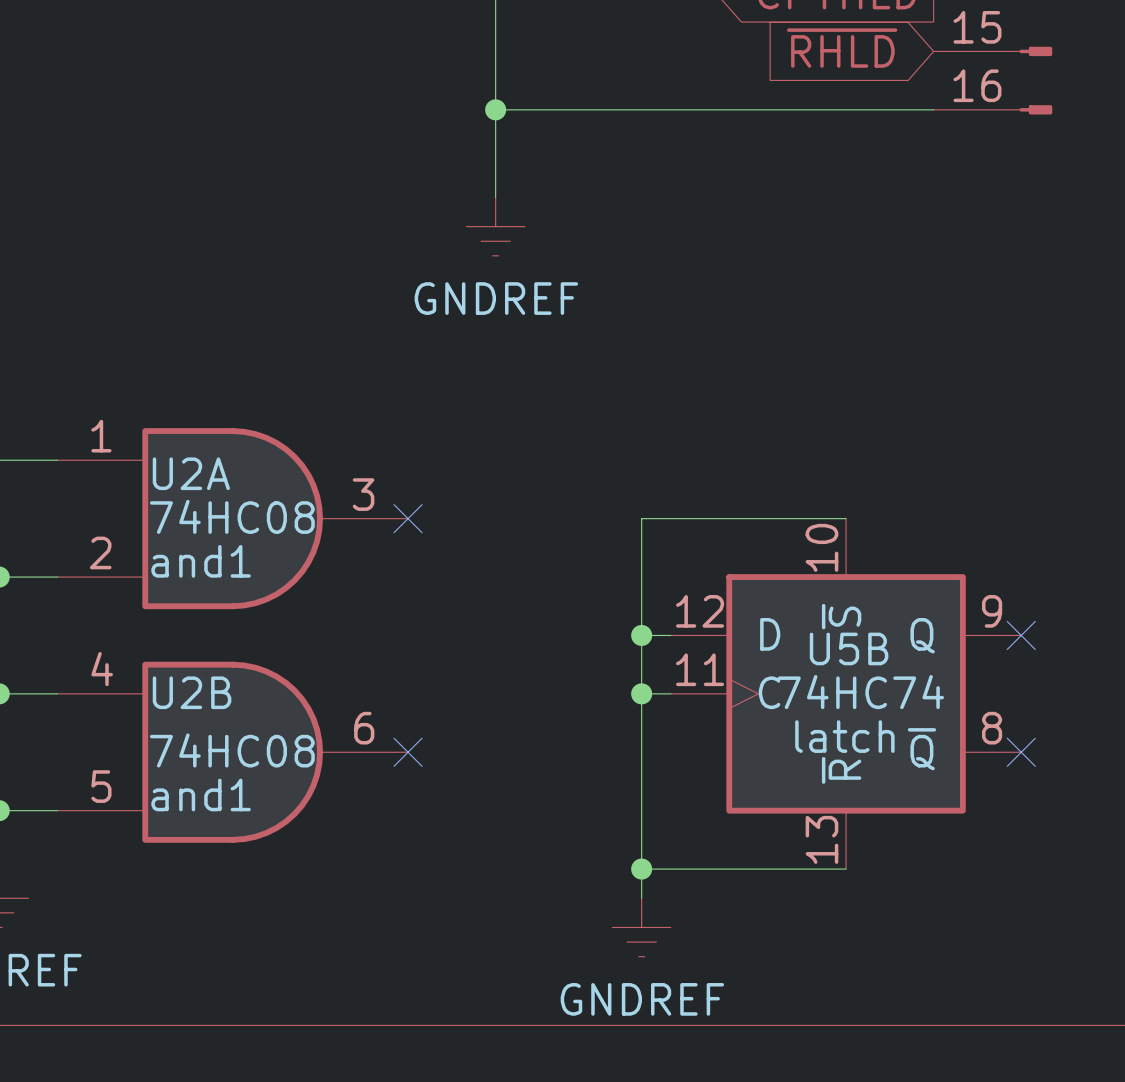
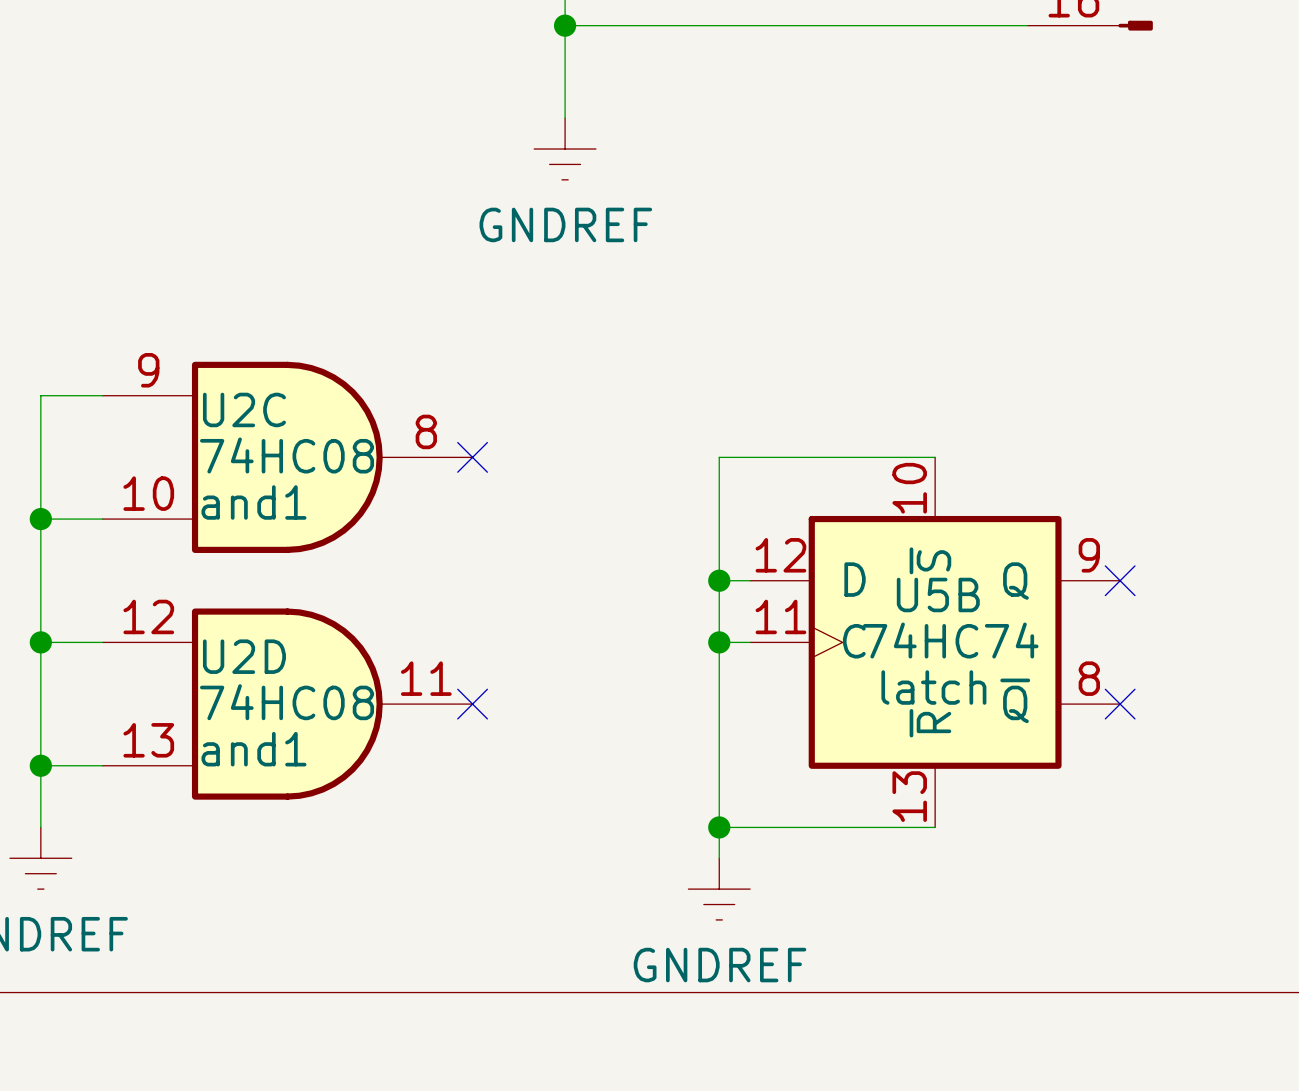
U2A pin number: 1 (101, 436) -> 9 (148, 370)
U2A name: U2A (191, 473) -> U2C (244, 409)
U2A pin number: 3 (363, 494) -> 8 (426, 431)
U2A pin number: 2 (100, 552) -> 10 (148, 493)
U2B pin number: 4 (102, 669) -> 12 (148, 616)
U2B name: U2B (192, 692) -> U2D (244, 656)
U2B pin number: 6 (364, 728) -> 11 (426, 678)
U2B pin number: 5 (101, 786) -> 13 (148, 740)

